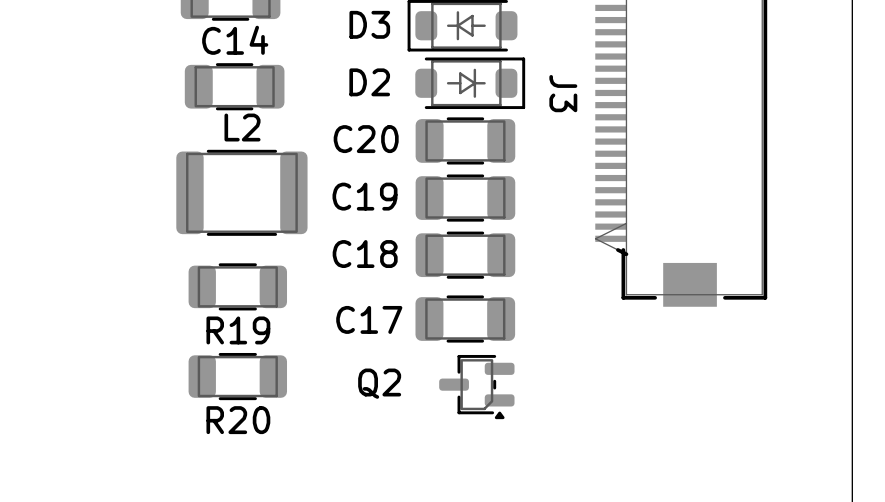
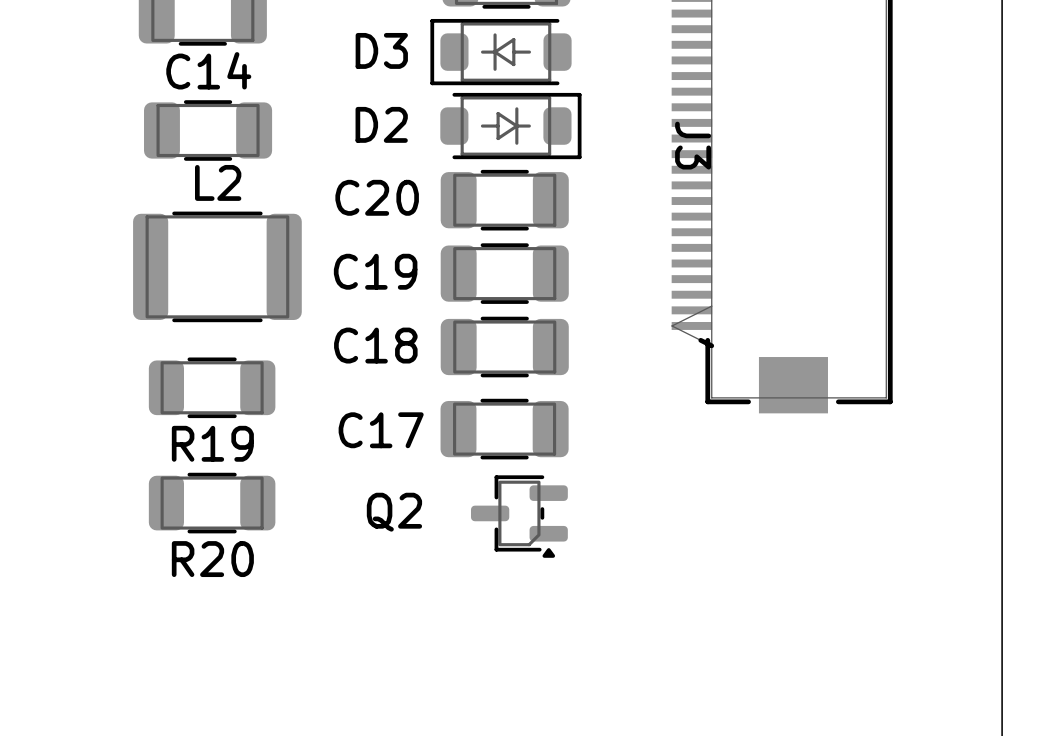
J3 name position: J3 (563, 93) -> J3 (693, 145)

